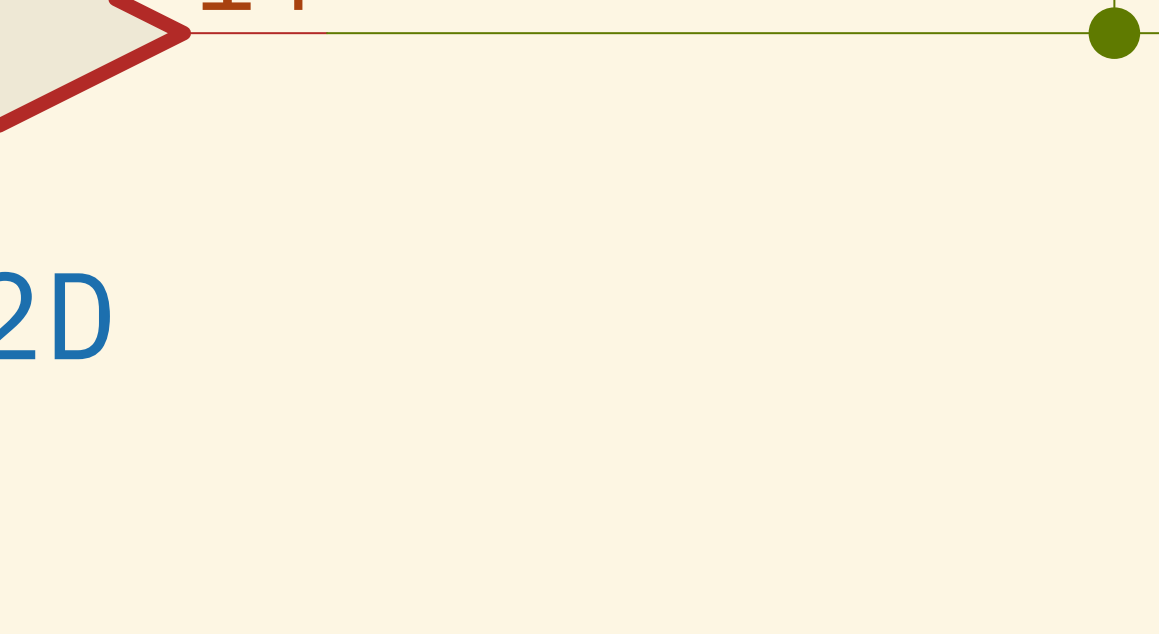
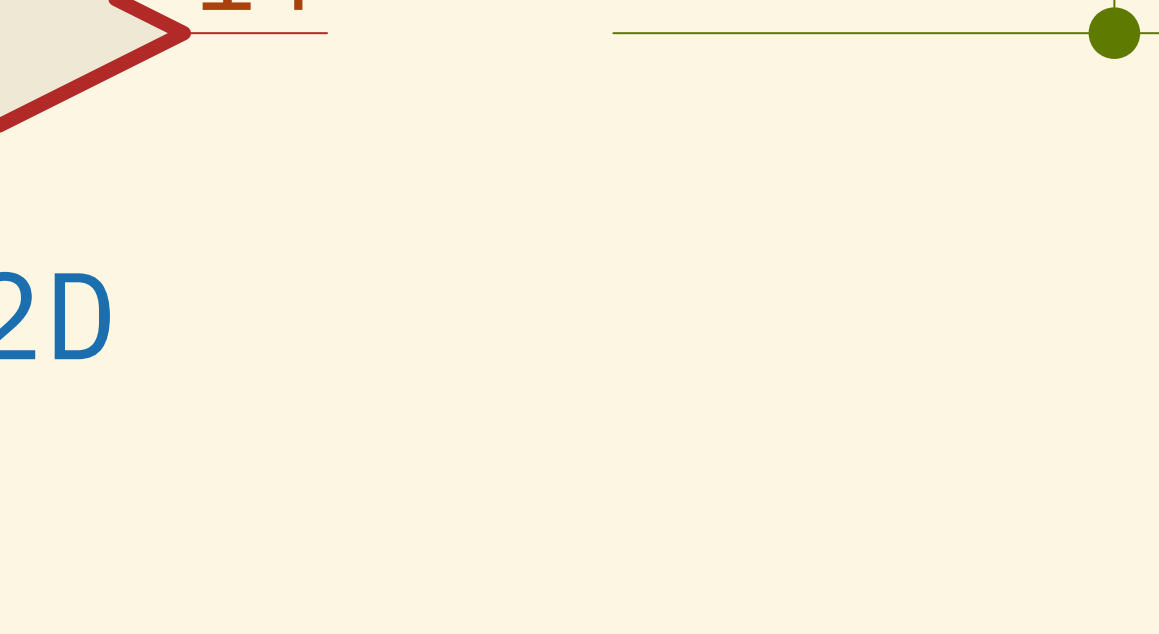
wire: (327, 33) (613, 33) -> none

